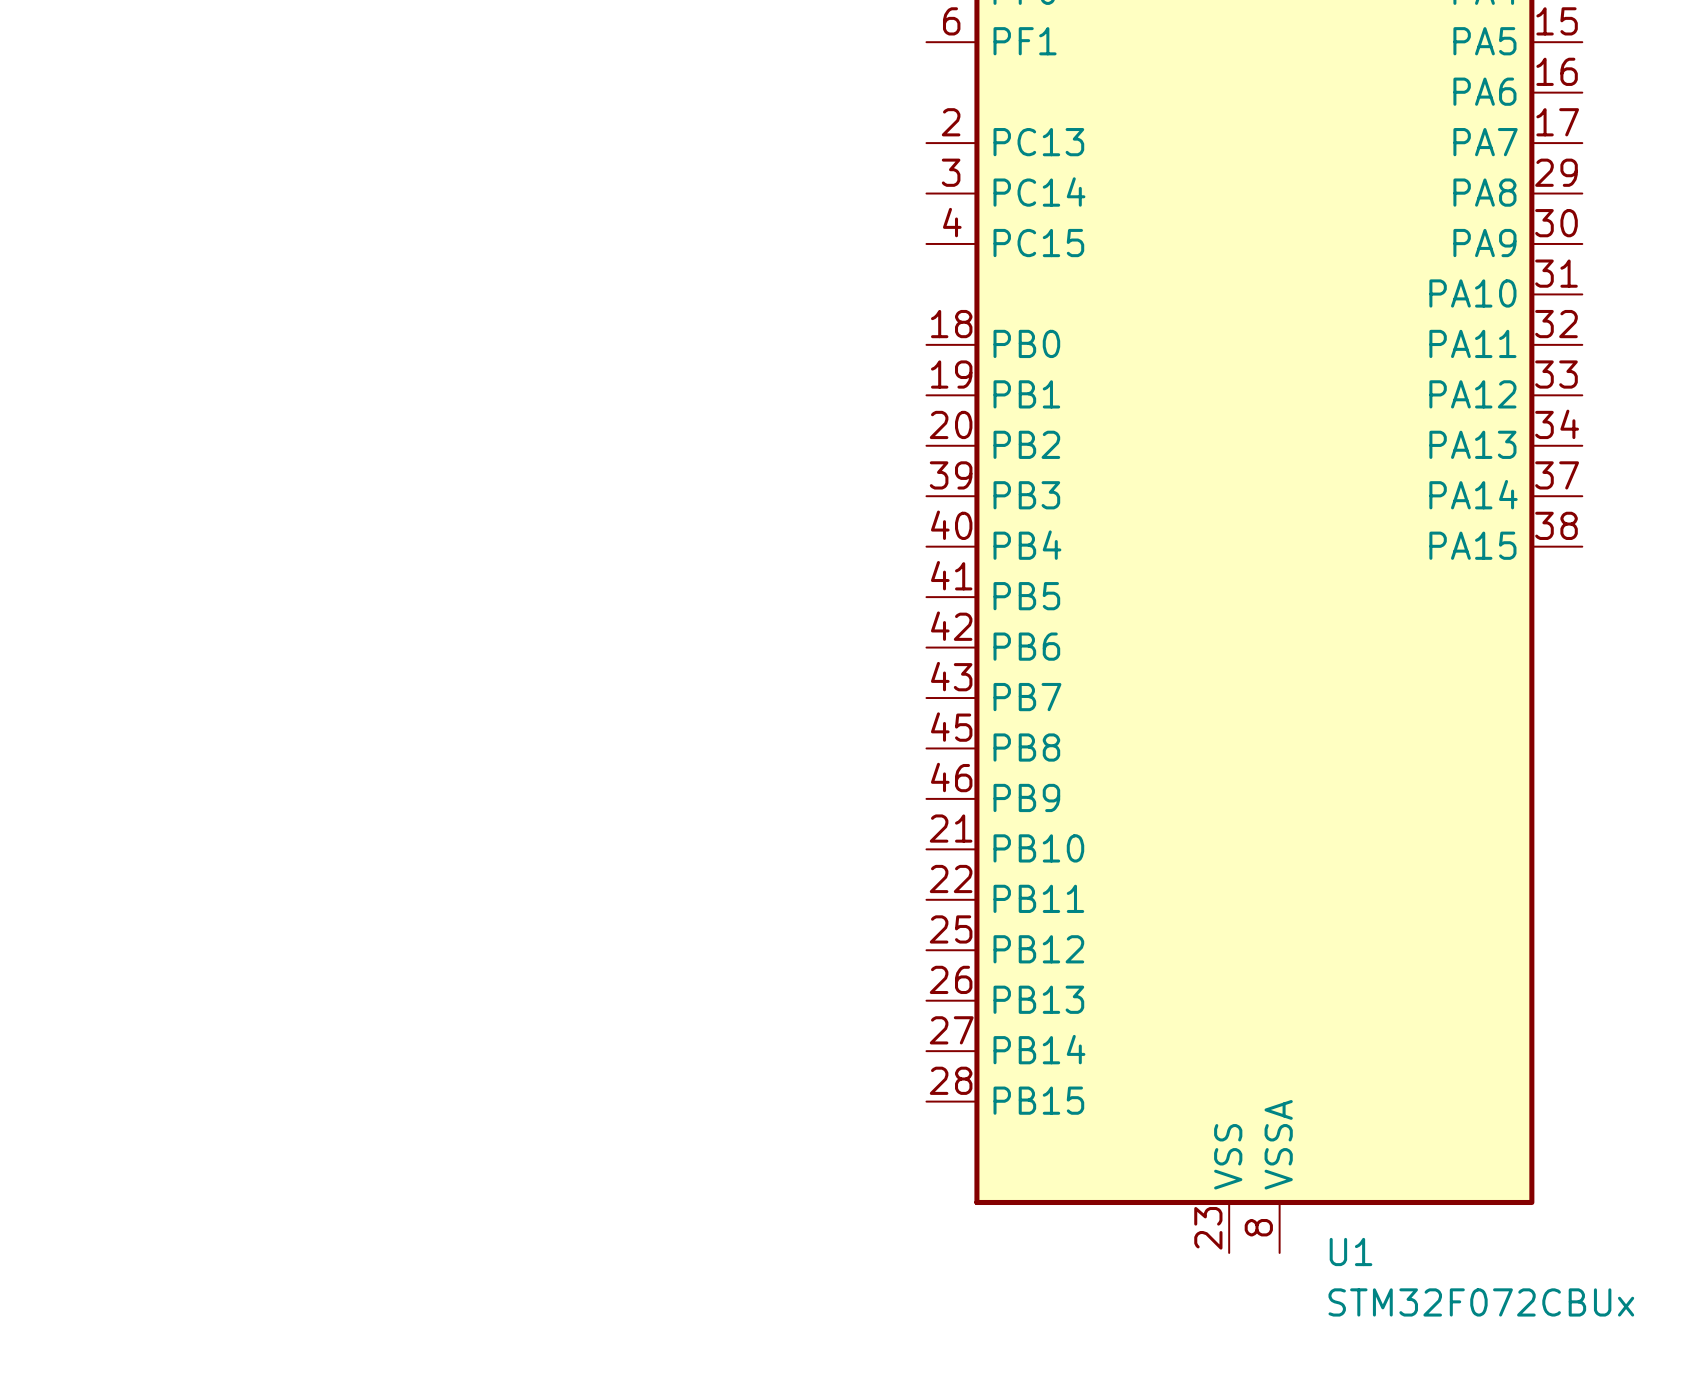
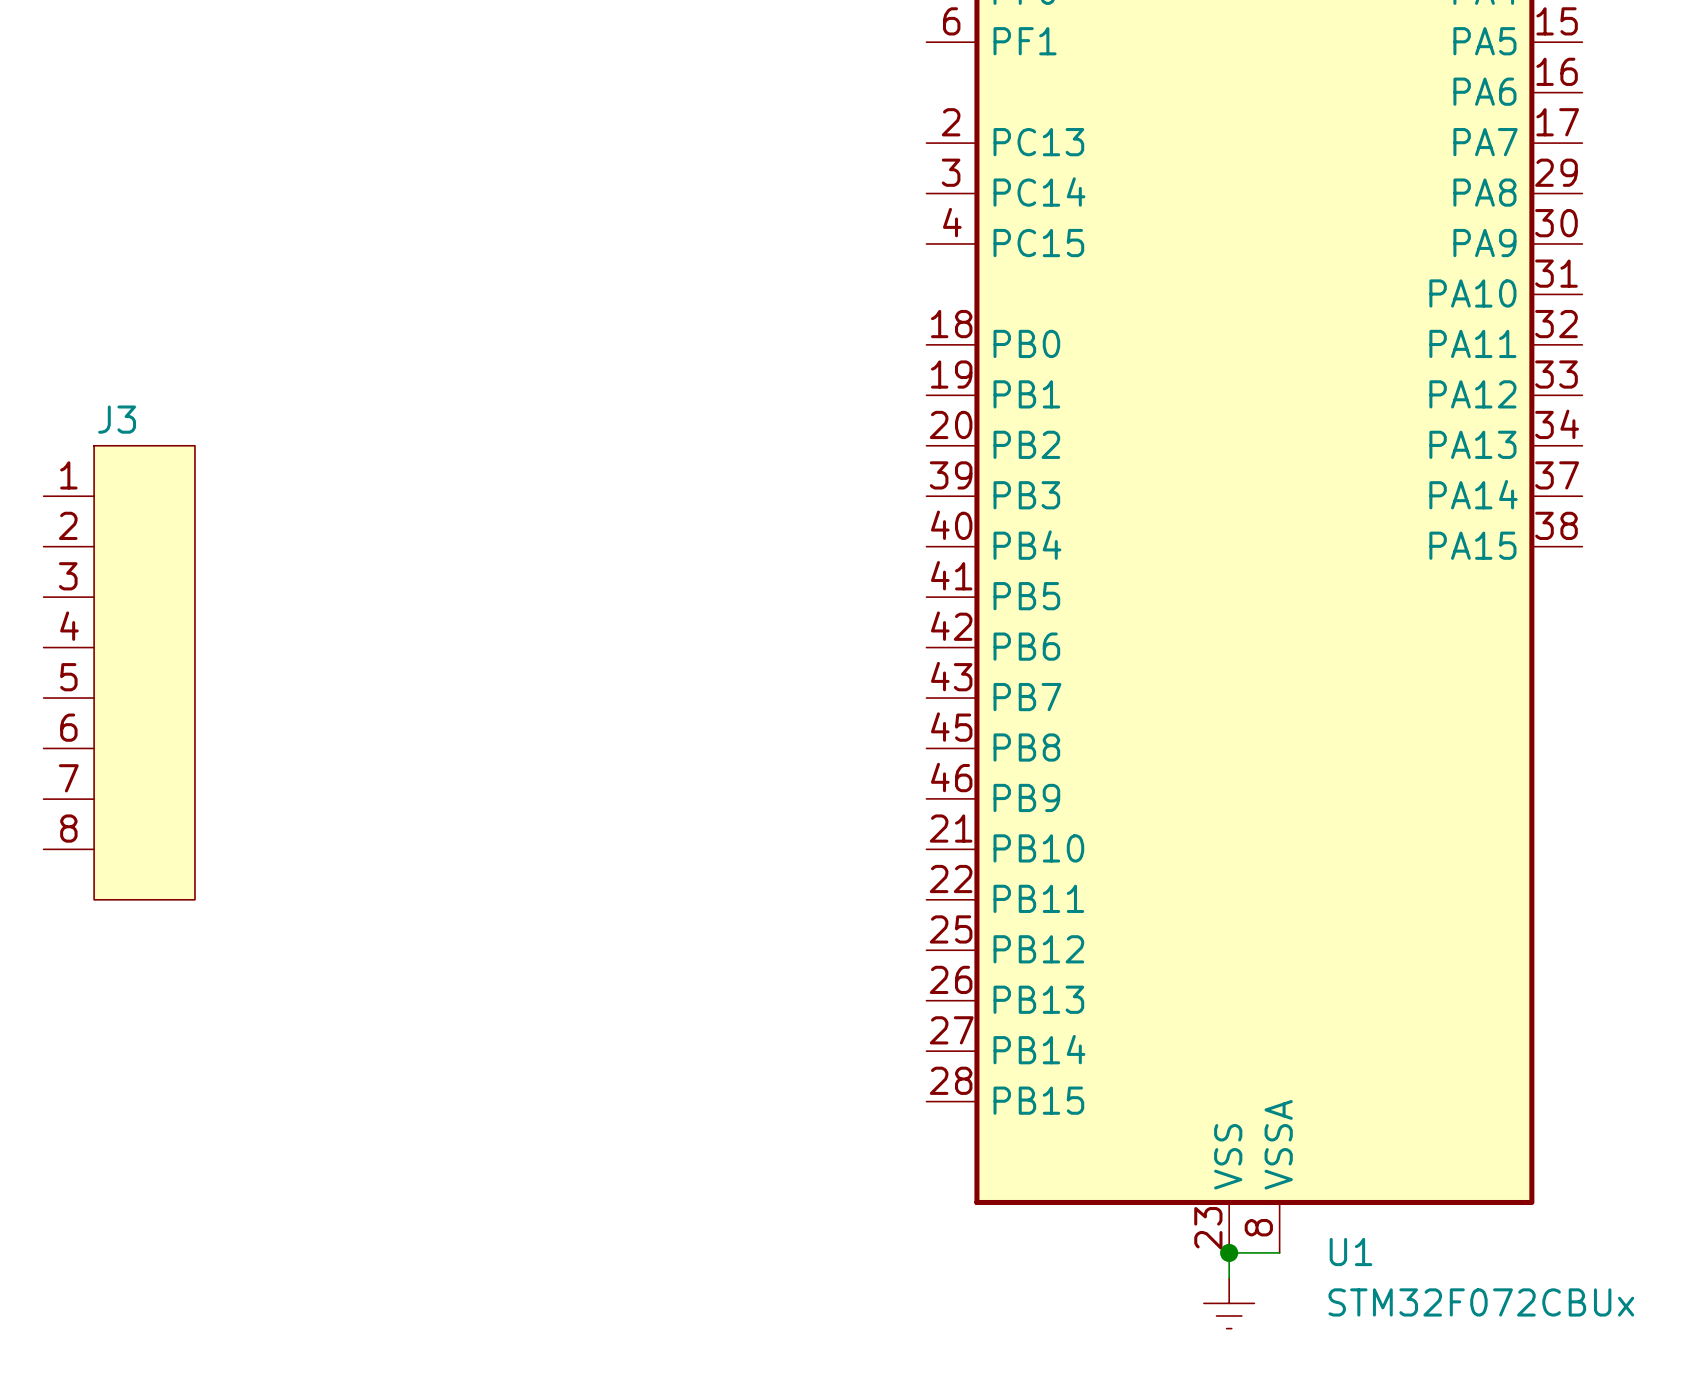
J3: none -> (119, 672)
junction: none -> (1229, 1252)
wire: none -> (1279, 1252) (1229, 1252) (1229, 1278)
power symbol: none -> (1229, 1303)

